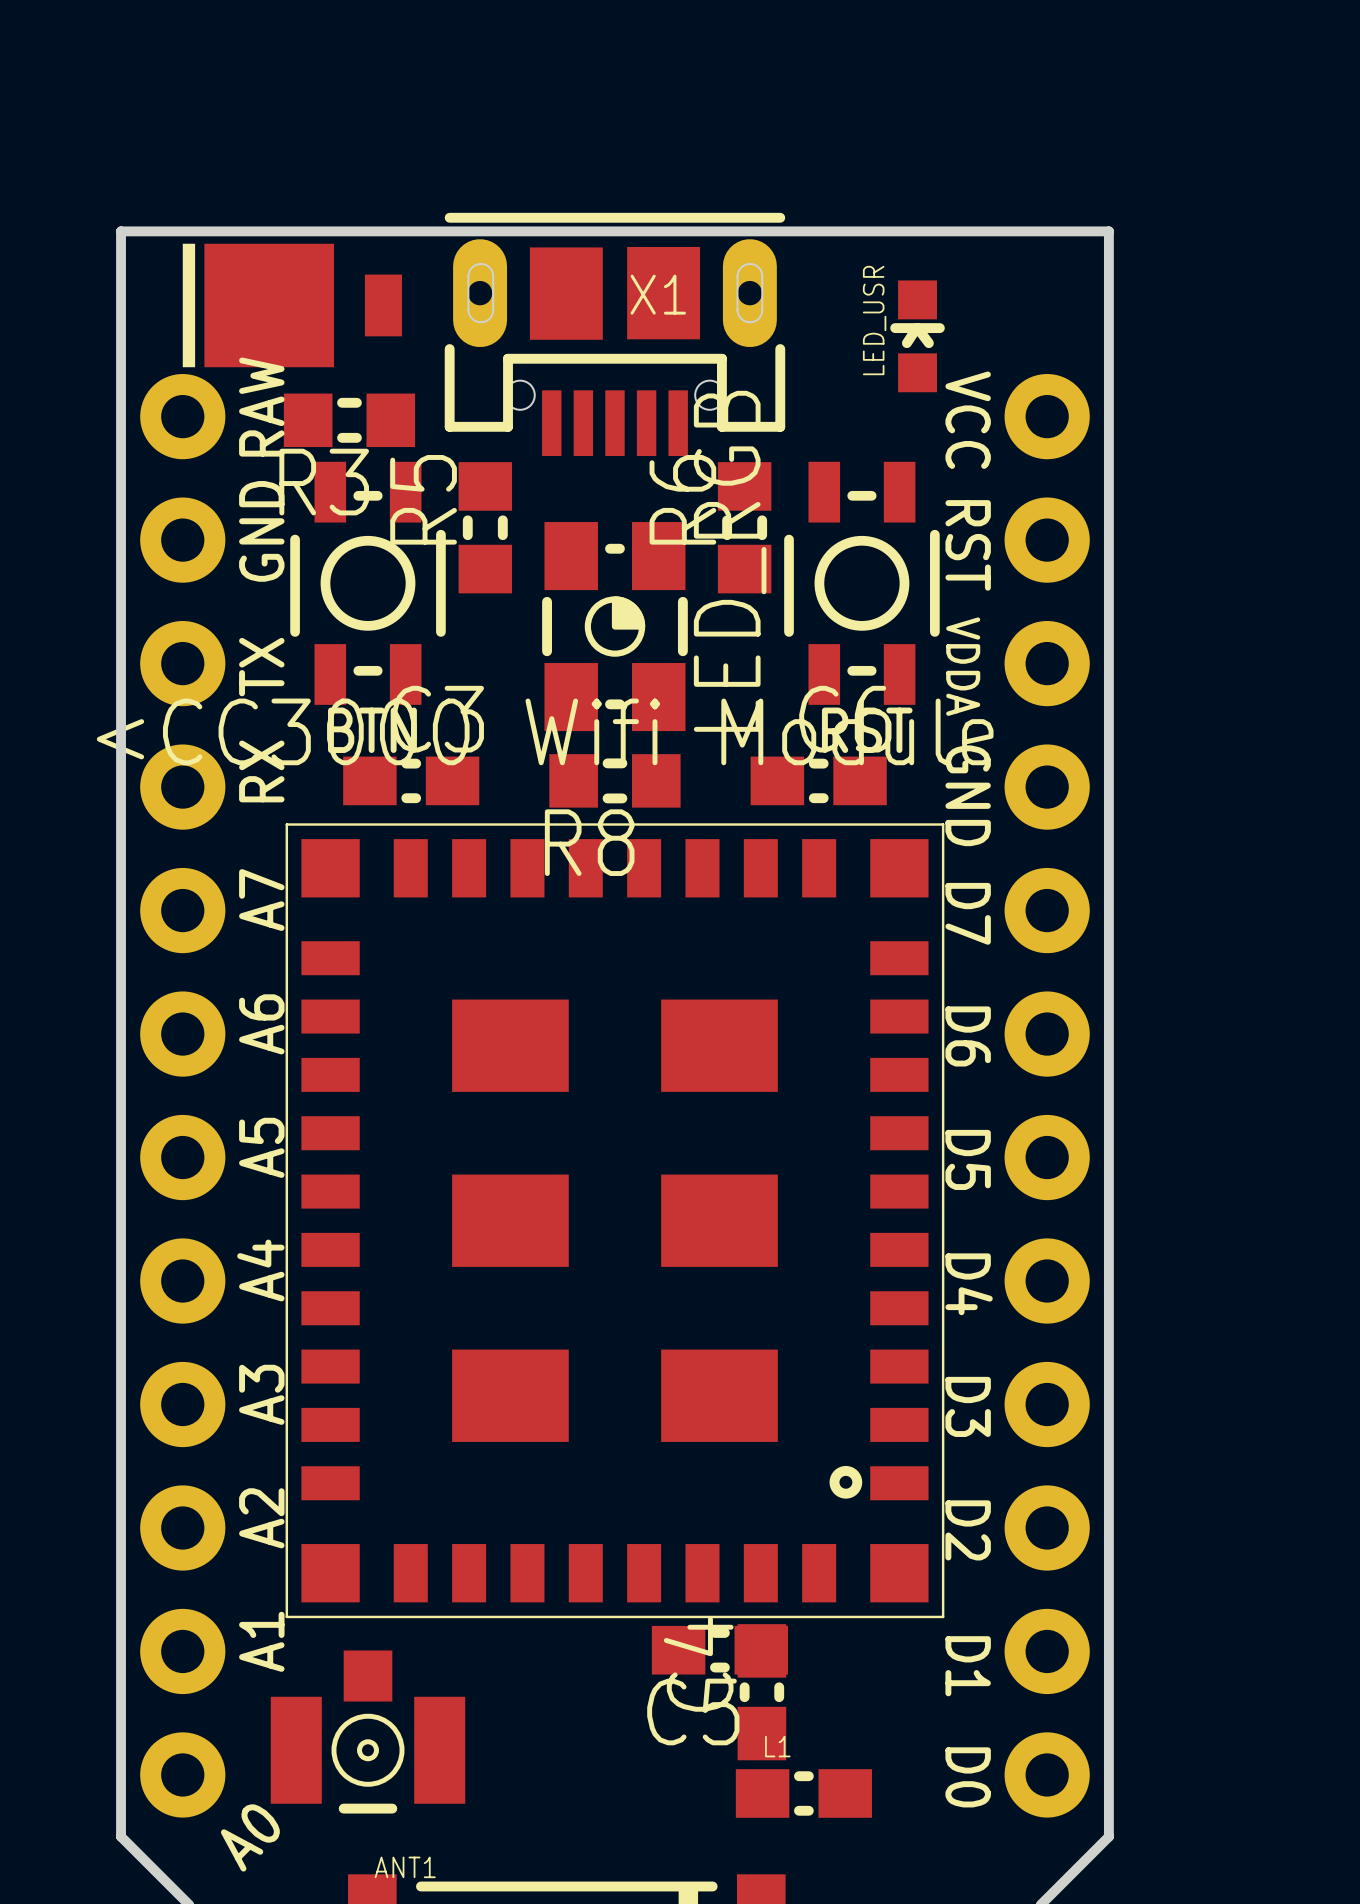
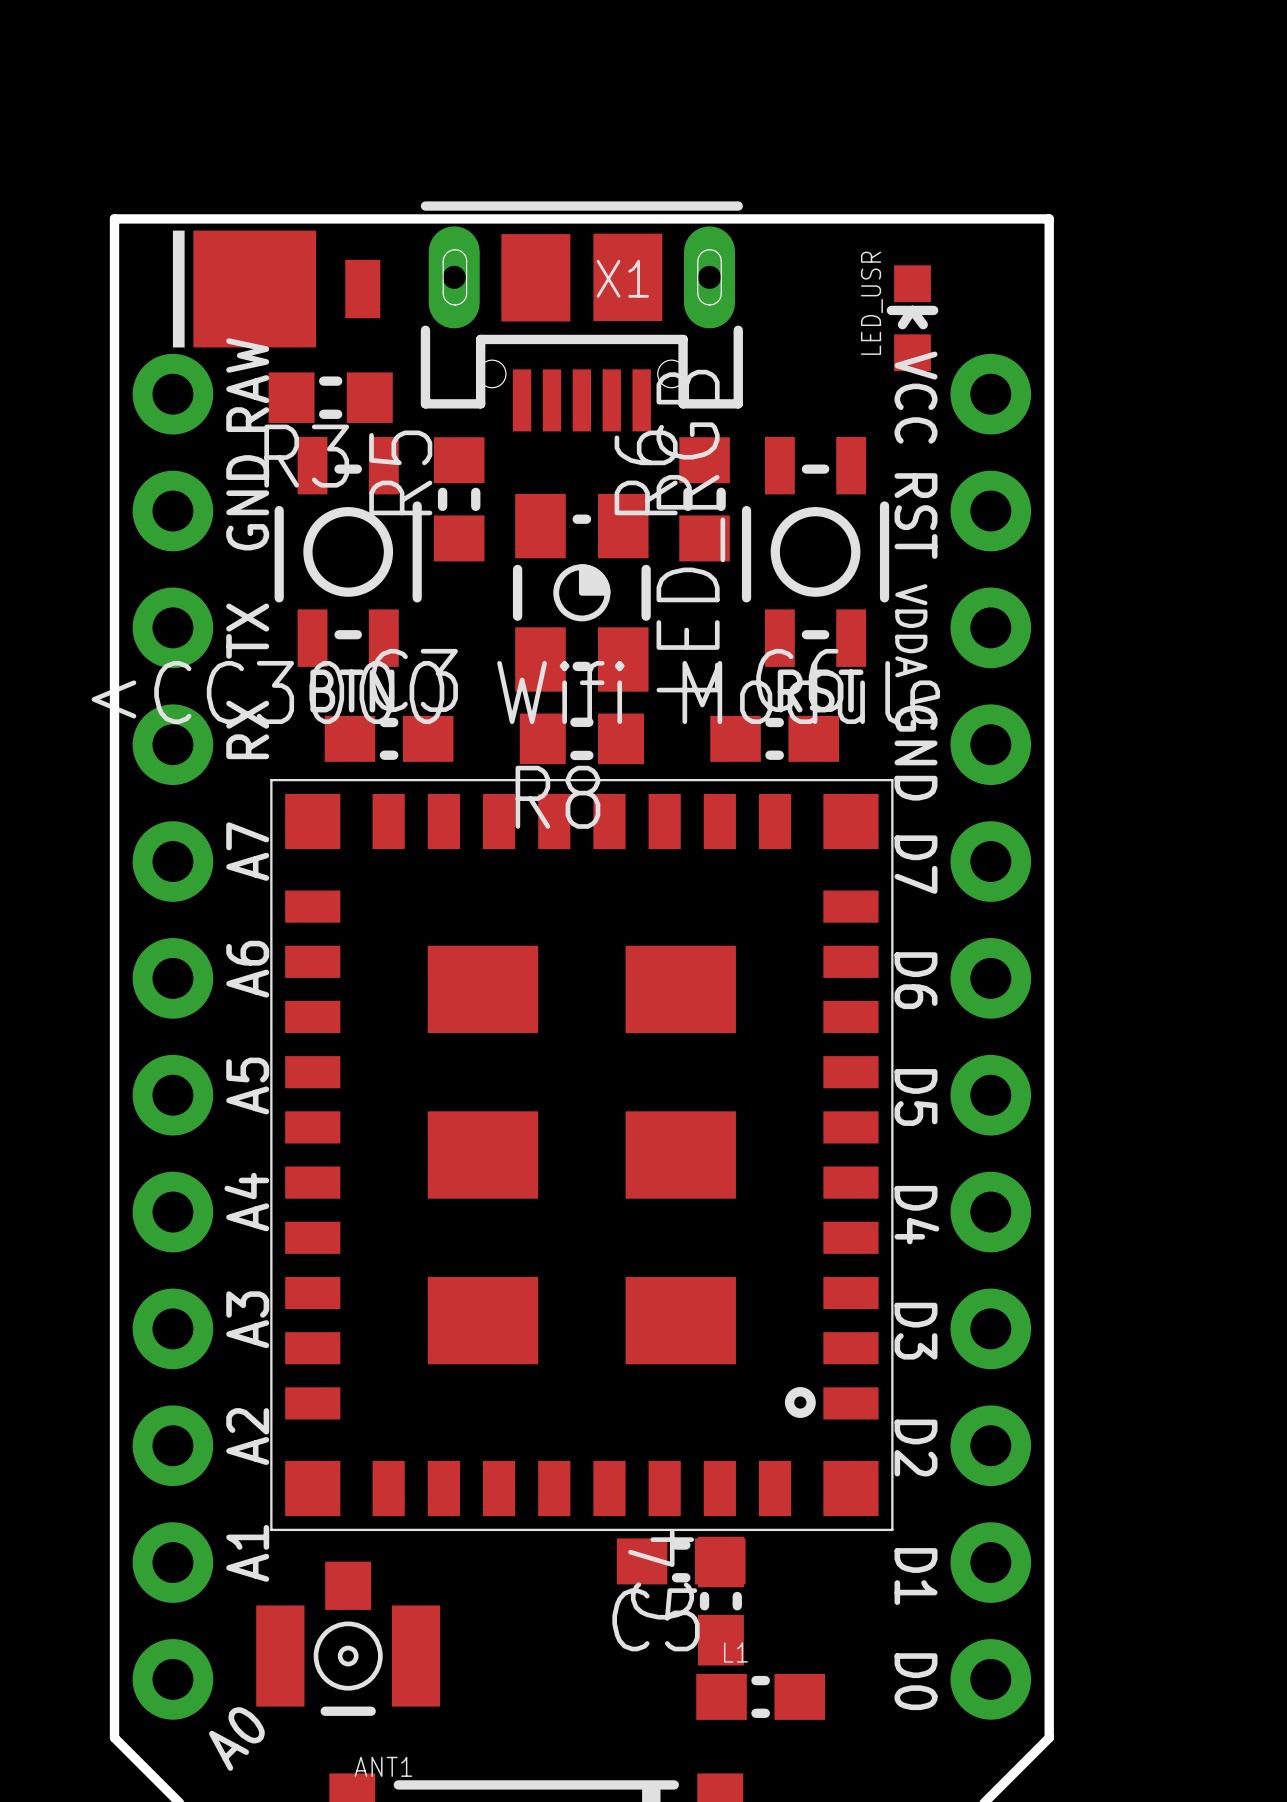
LED_USR position: (917, 336) -> (912, 318)

